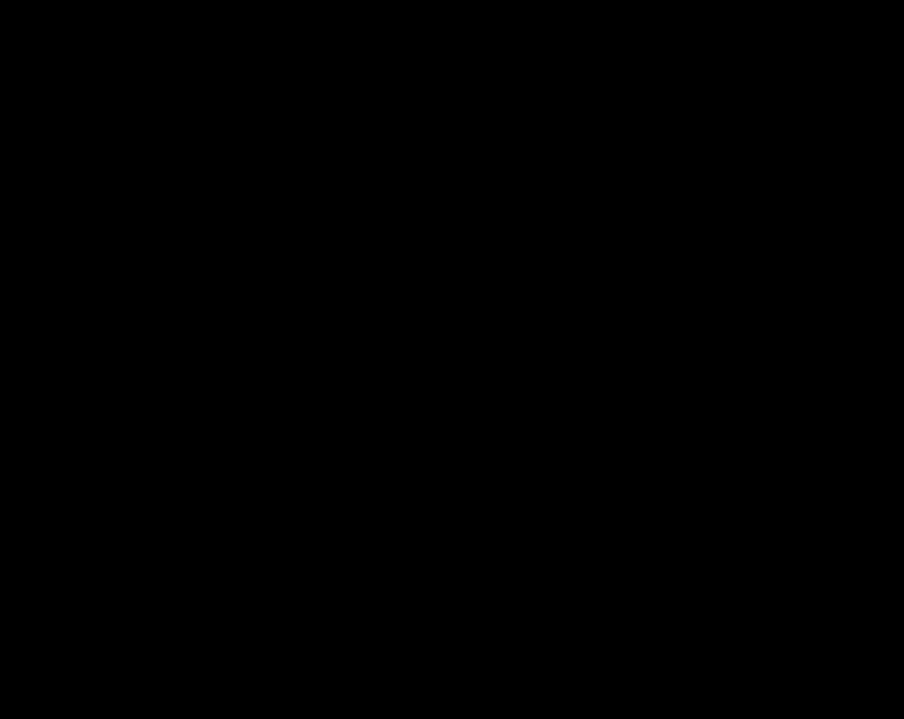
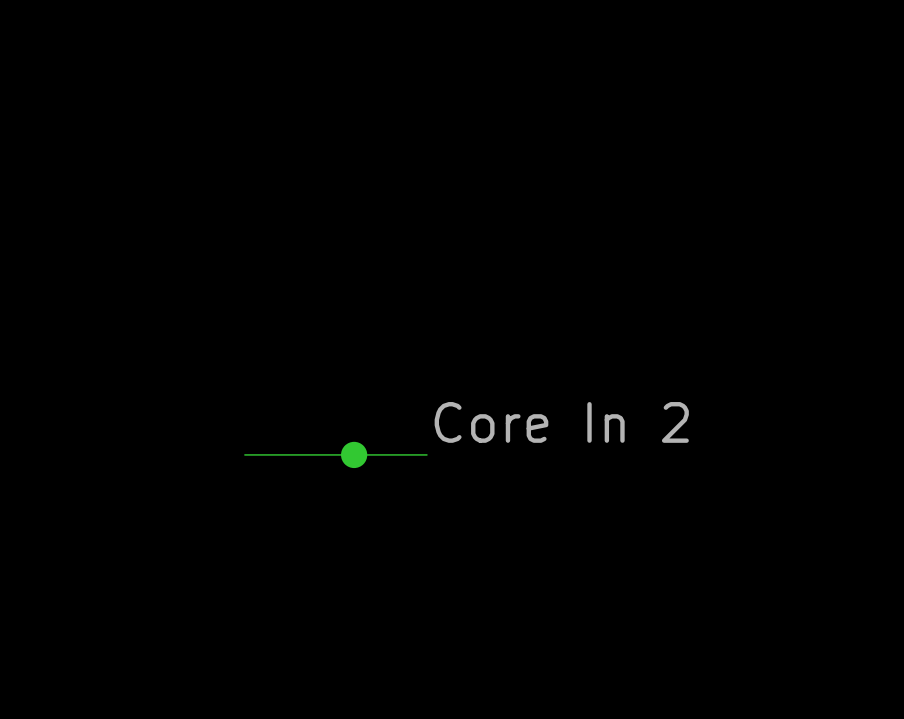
label: none -> Core In 2 (561, 422)
wire: none -> (244, 454) (427, 454)
junction: none -> (354, 454)

